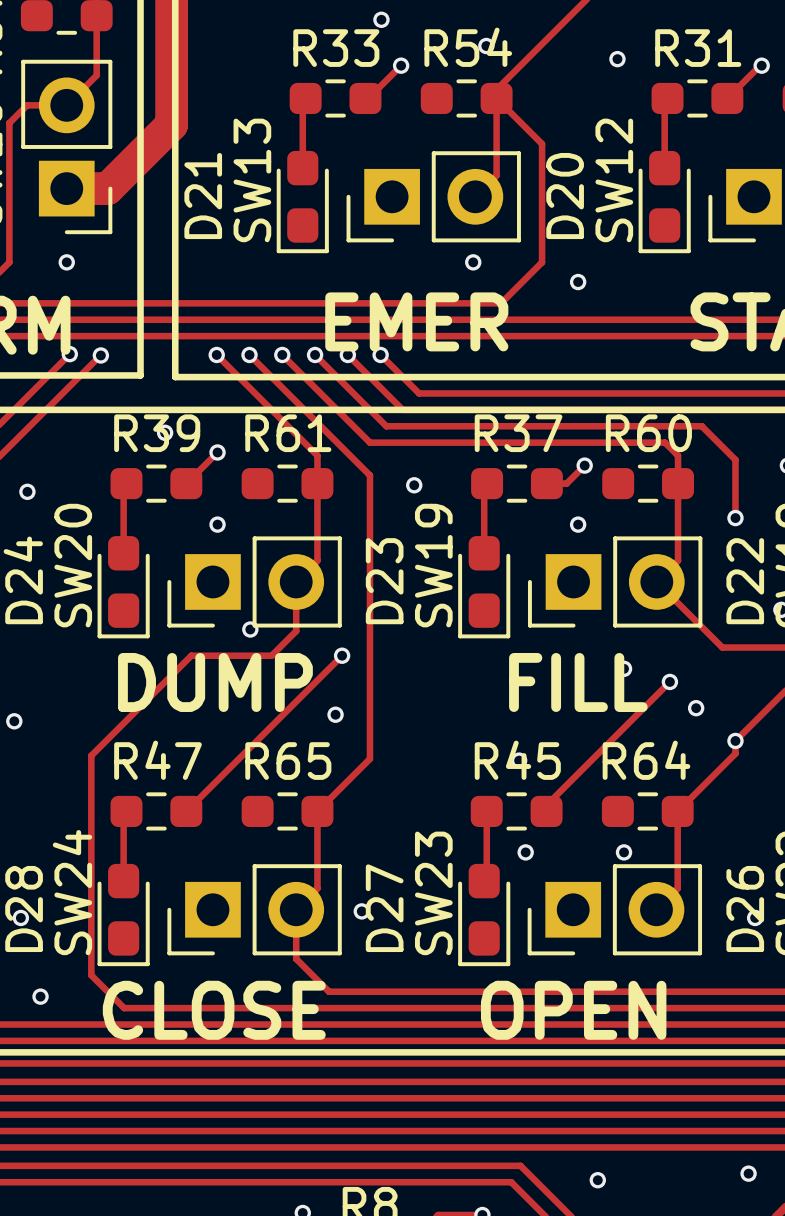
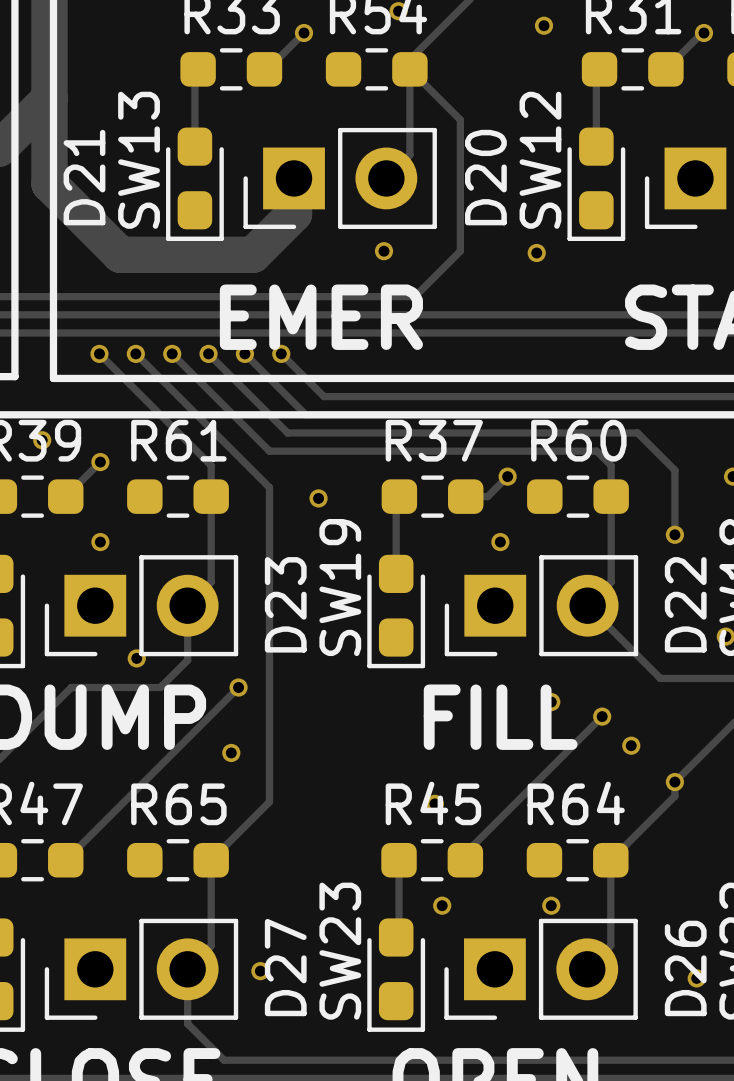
track: none -> (49, 98) (49, 183) (120, 254) (253, 254) (294, 213) (294, 178)
via position: (578, 282) -> (536, 252)

